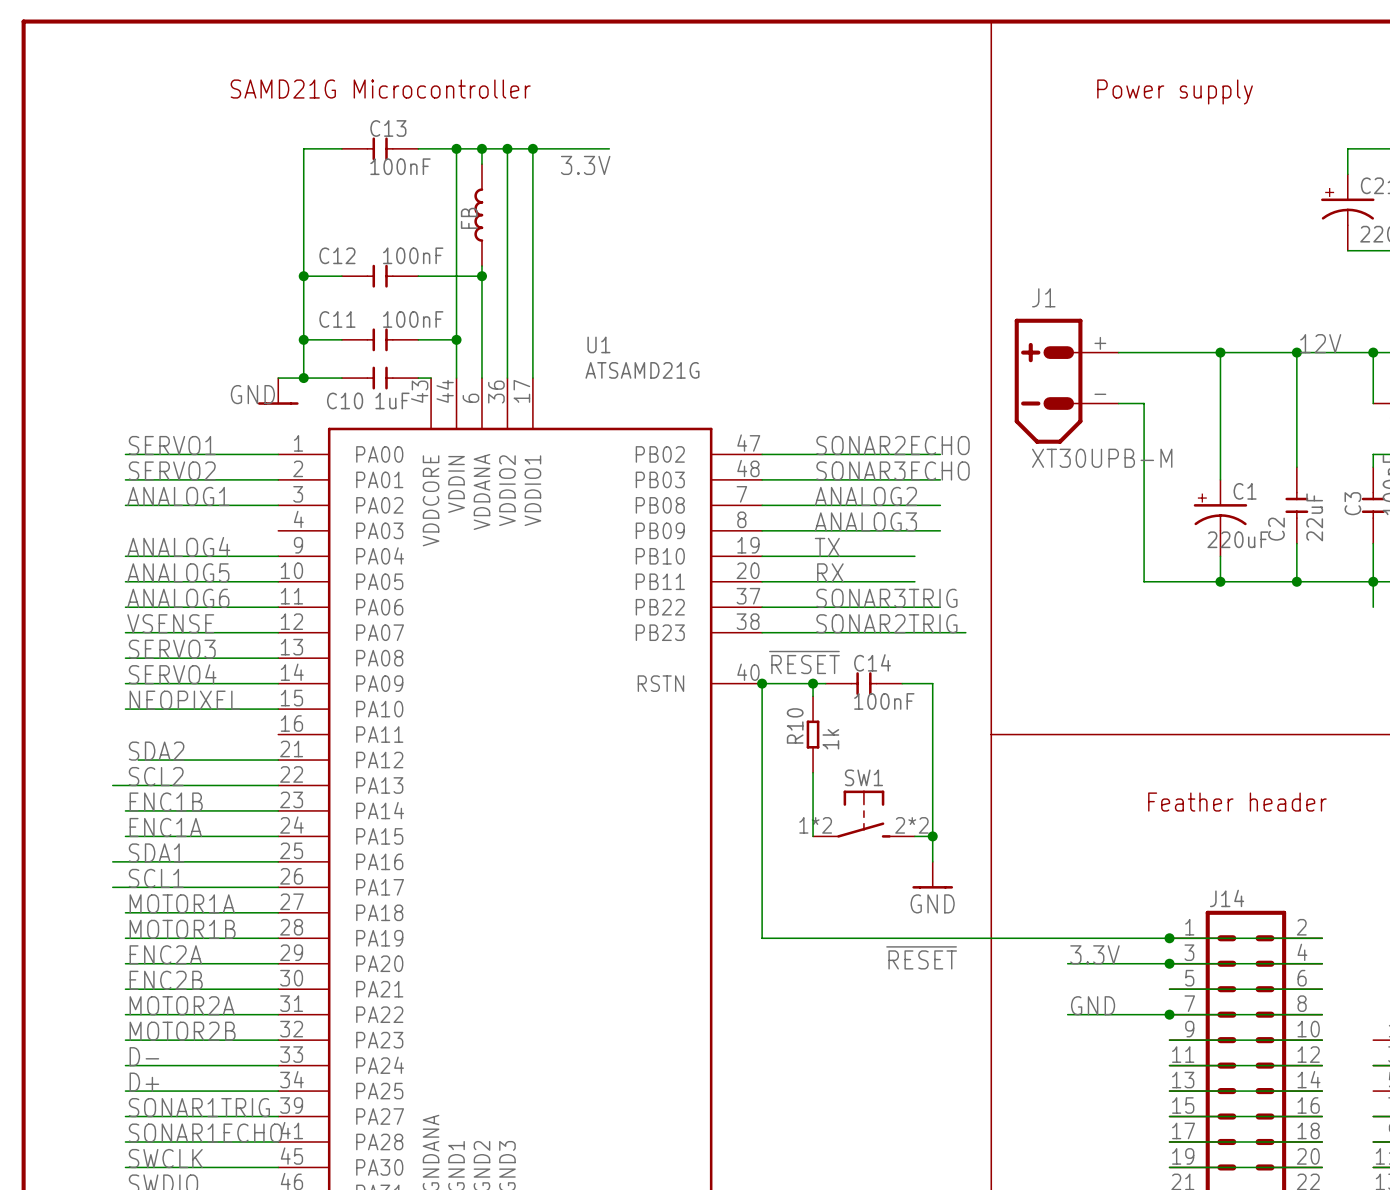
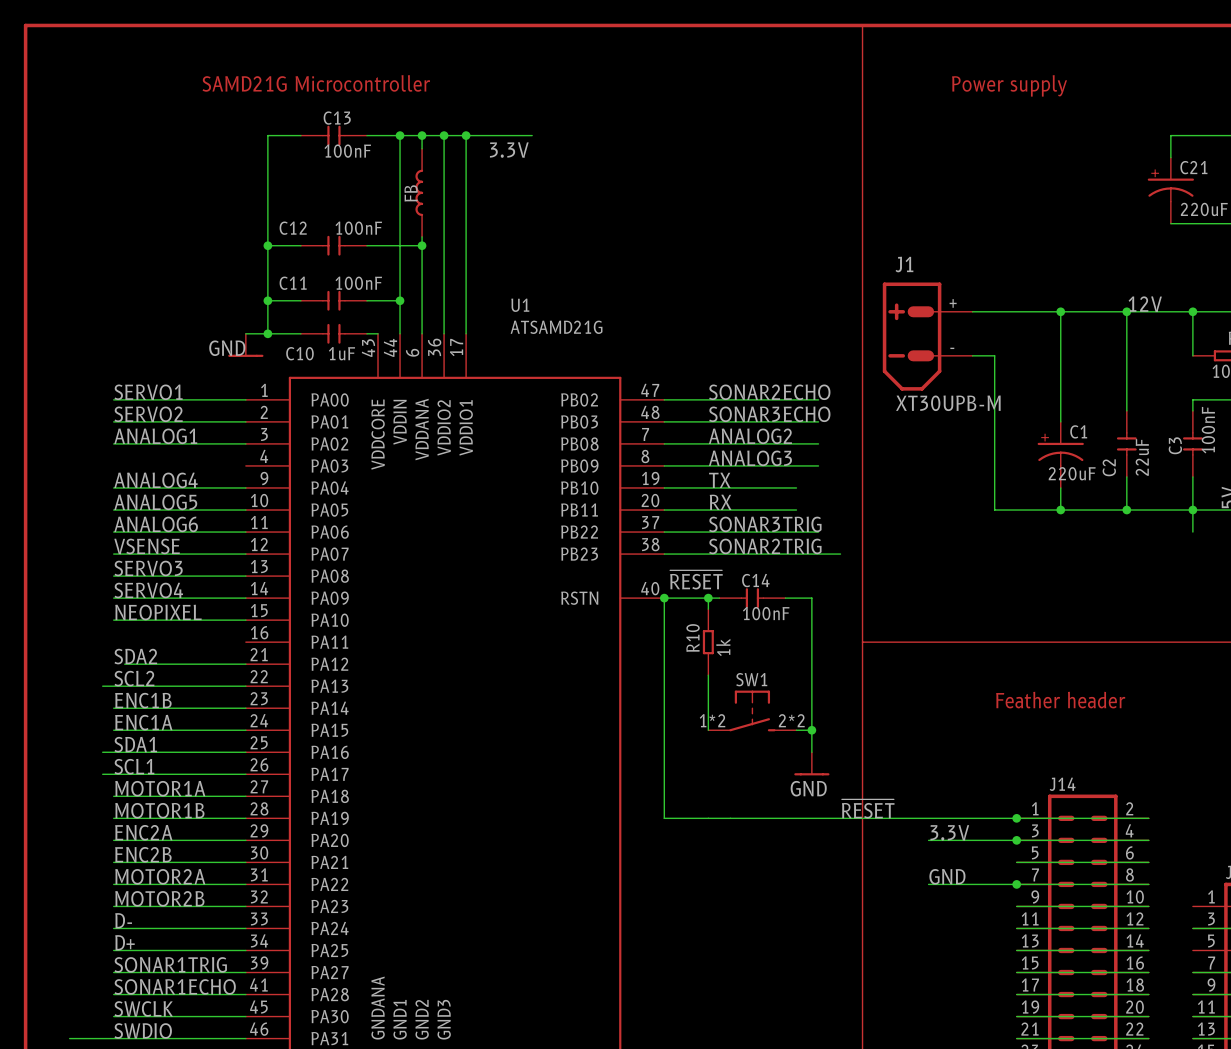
label position: ~{RESET} (921, 957) -> ~{RESET} (868, 808)

